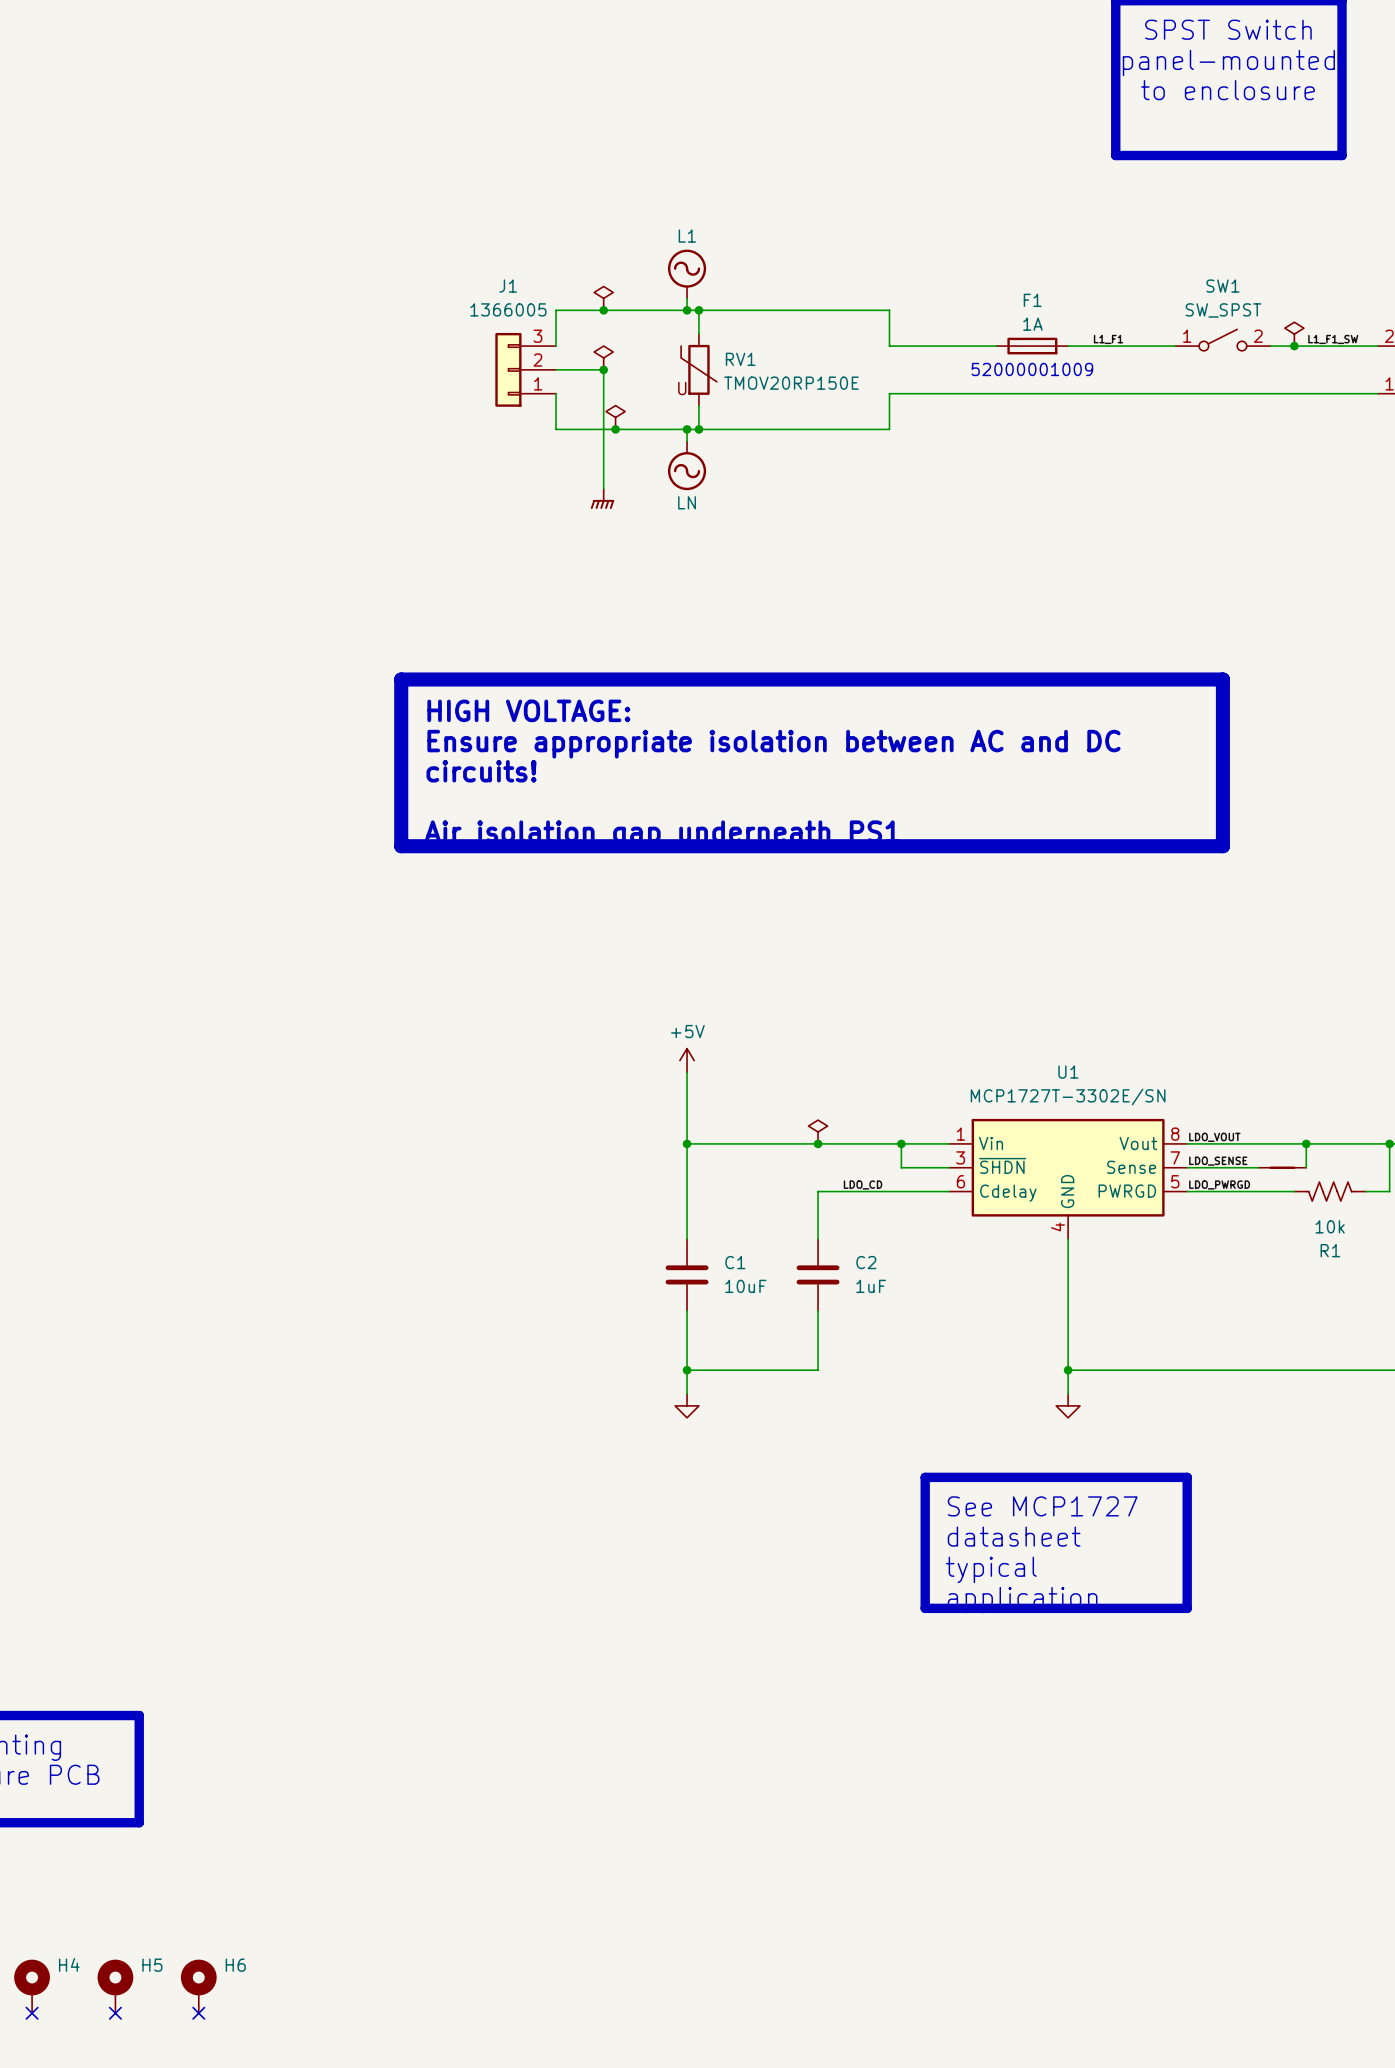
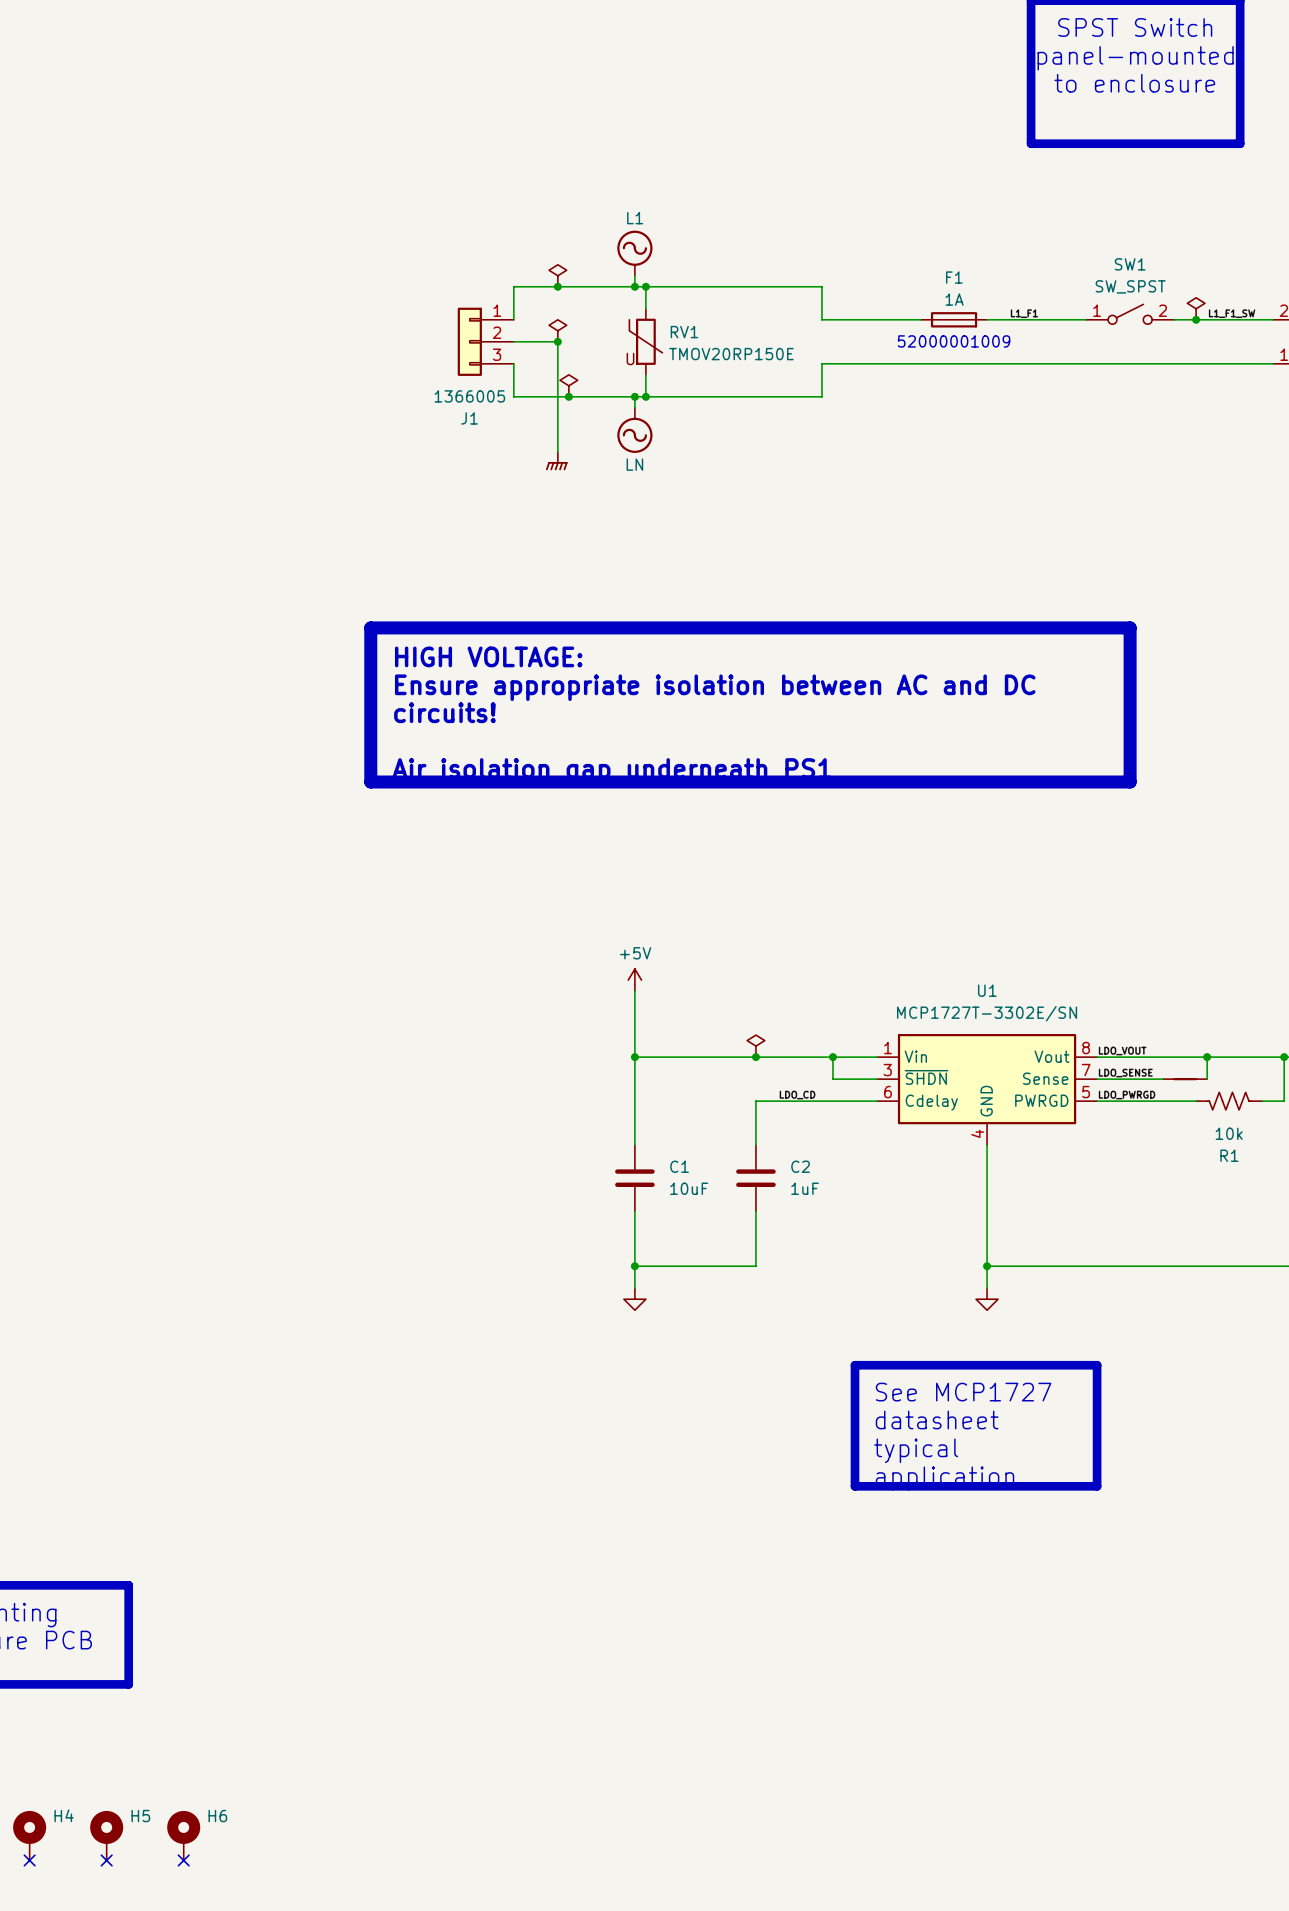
J1 flip: as is (508, 369) -> up-down (469, 341)

